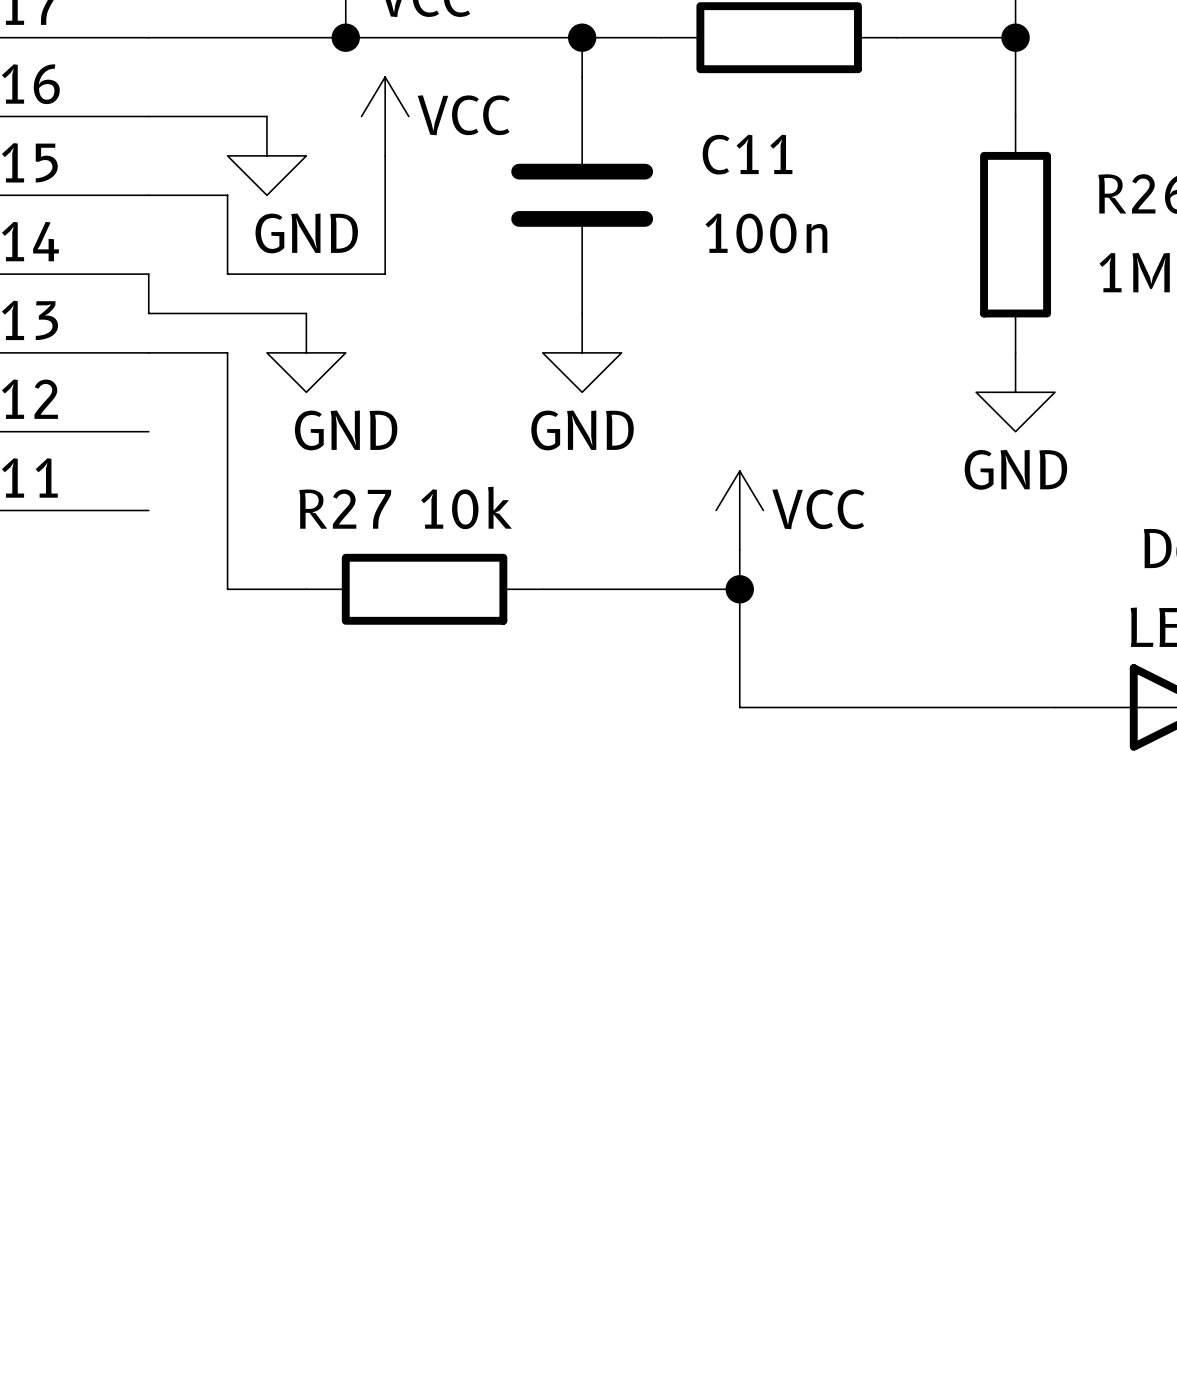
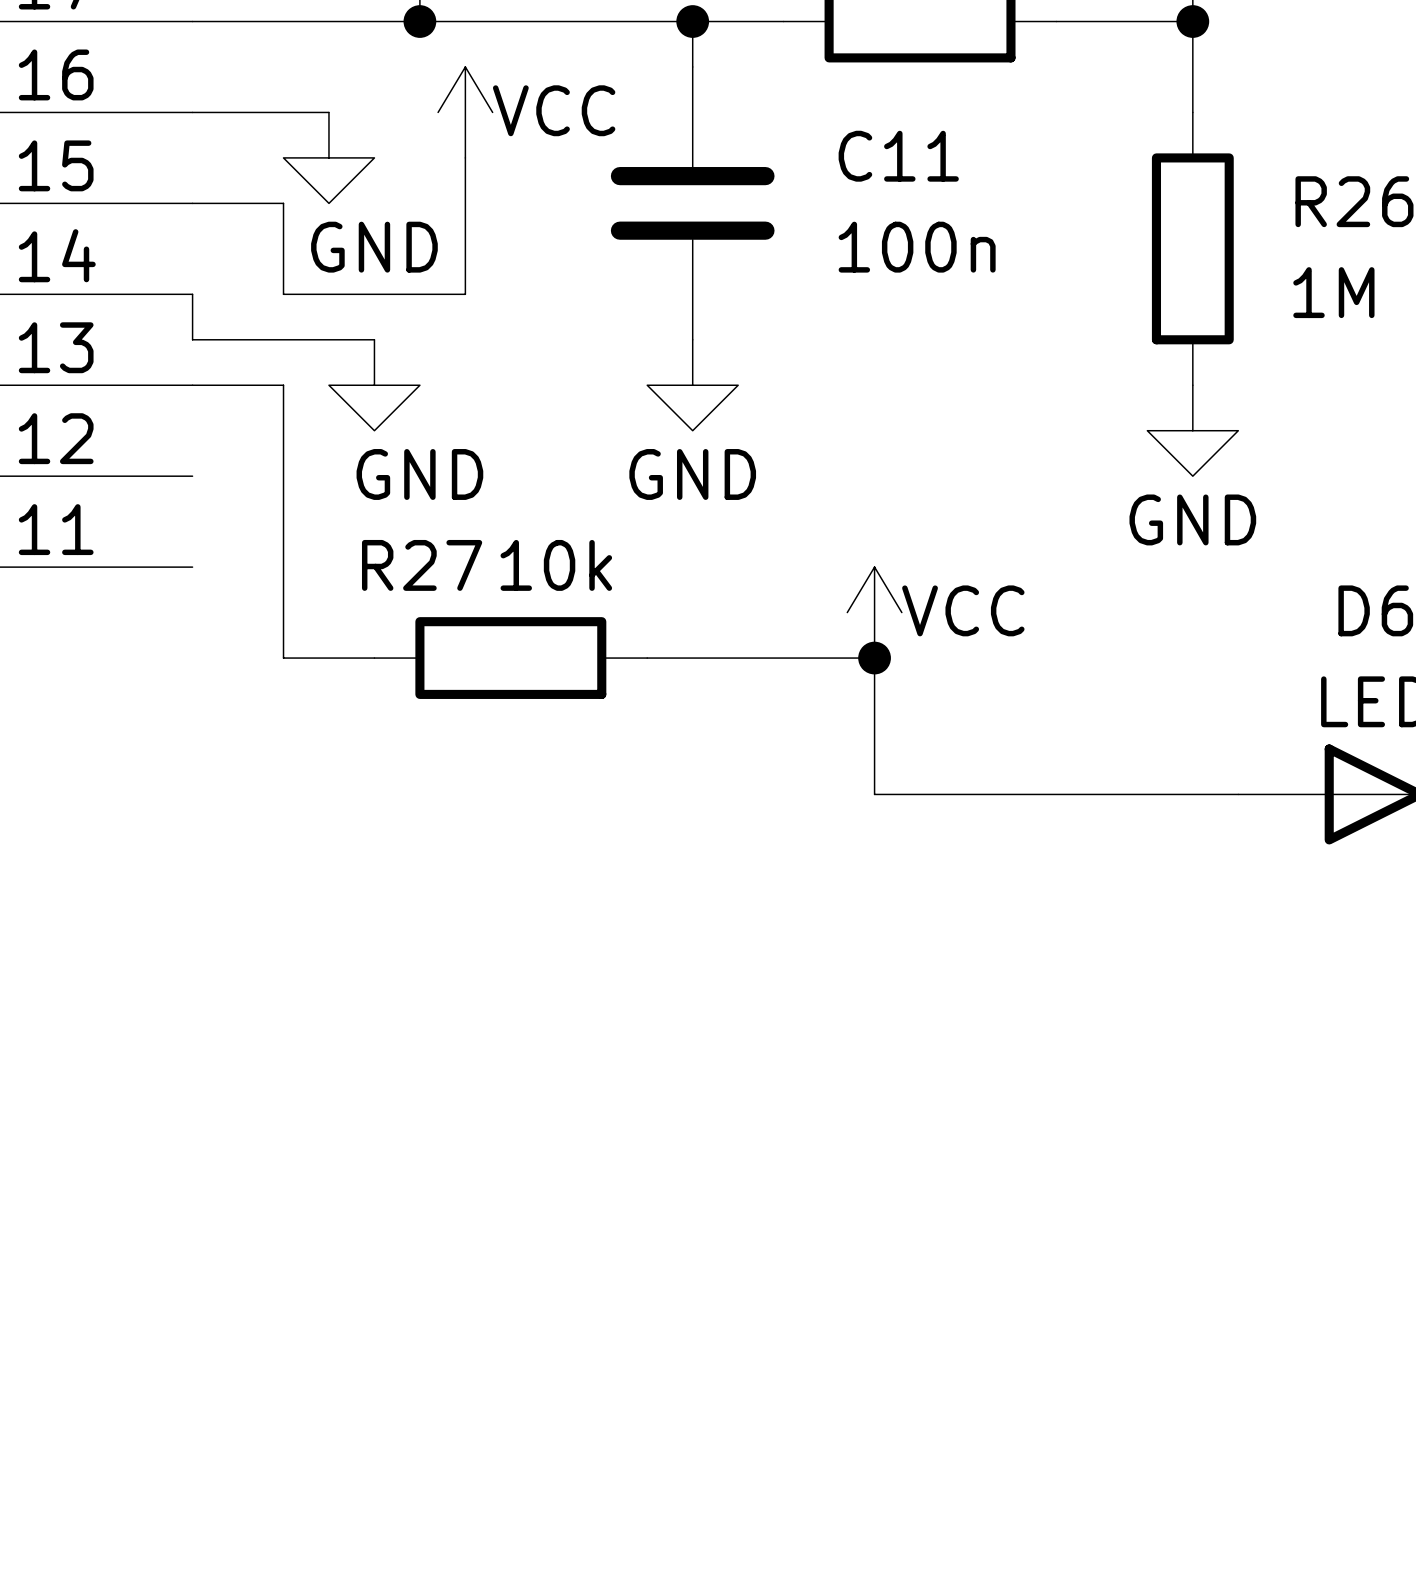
power symbol position: VCC (739, 510) -> VCC (874, 612)

